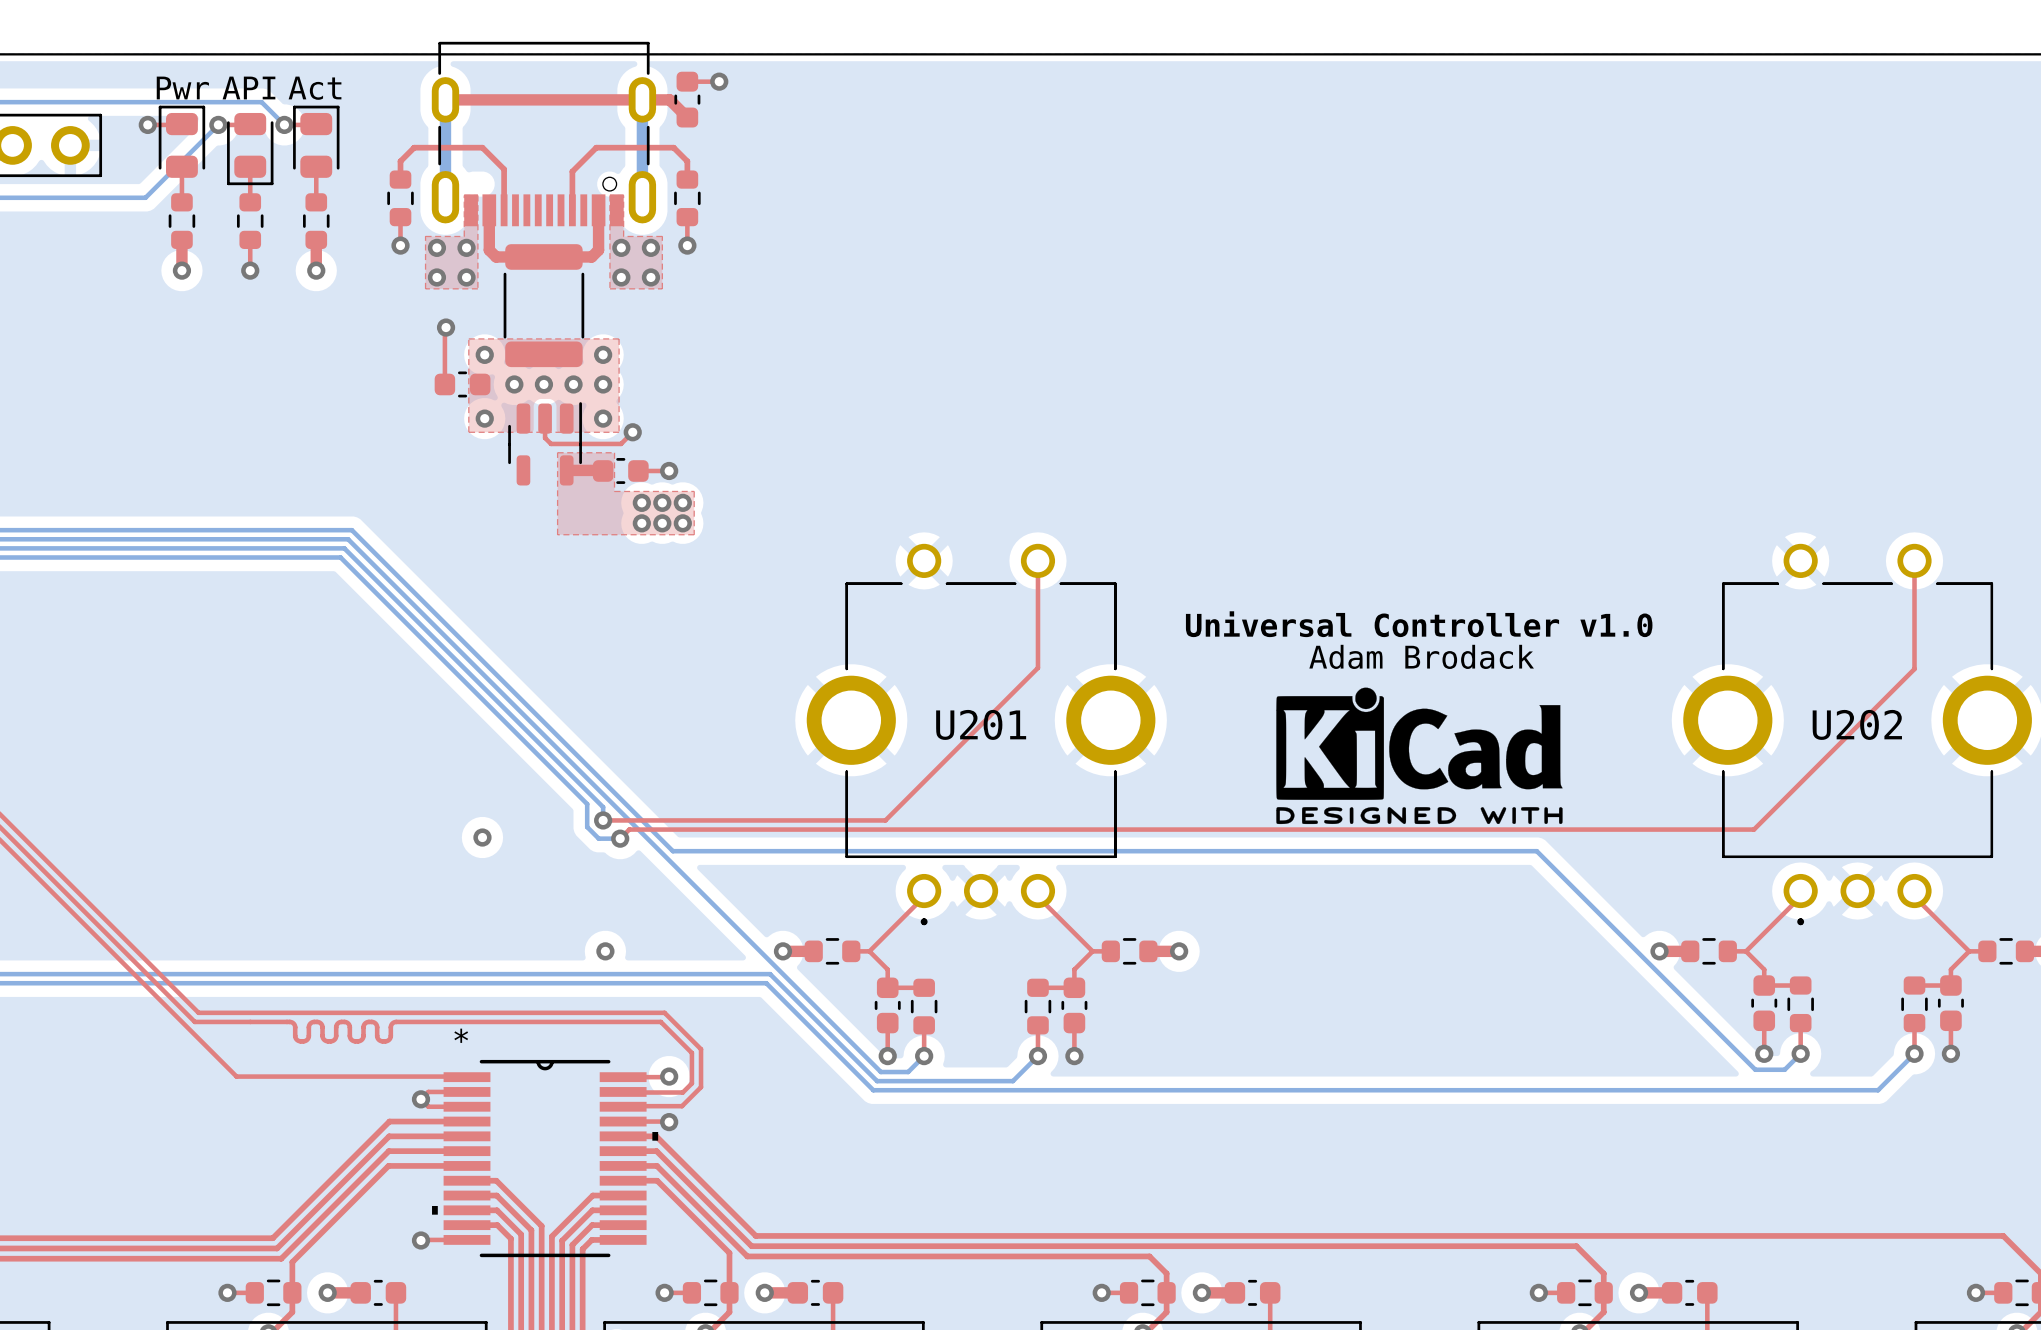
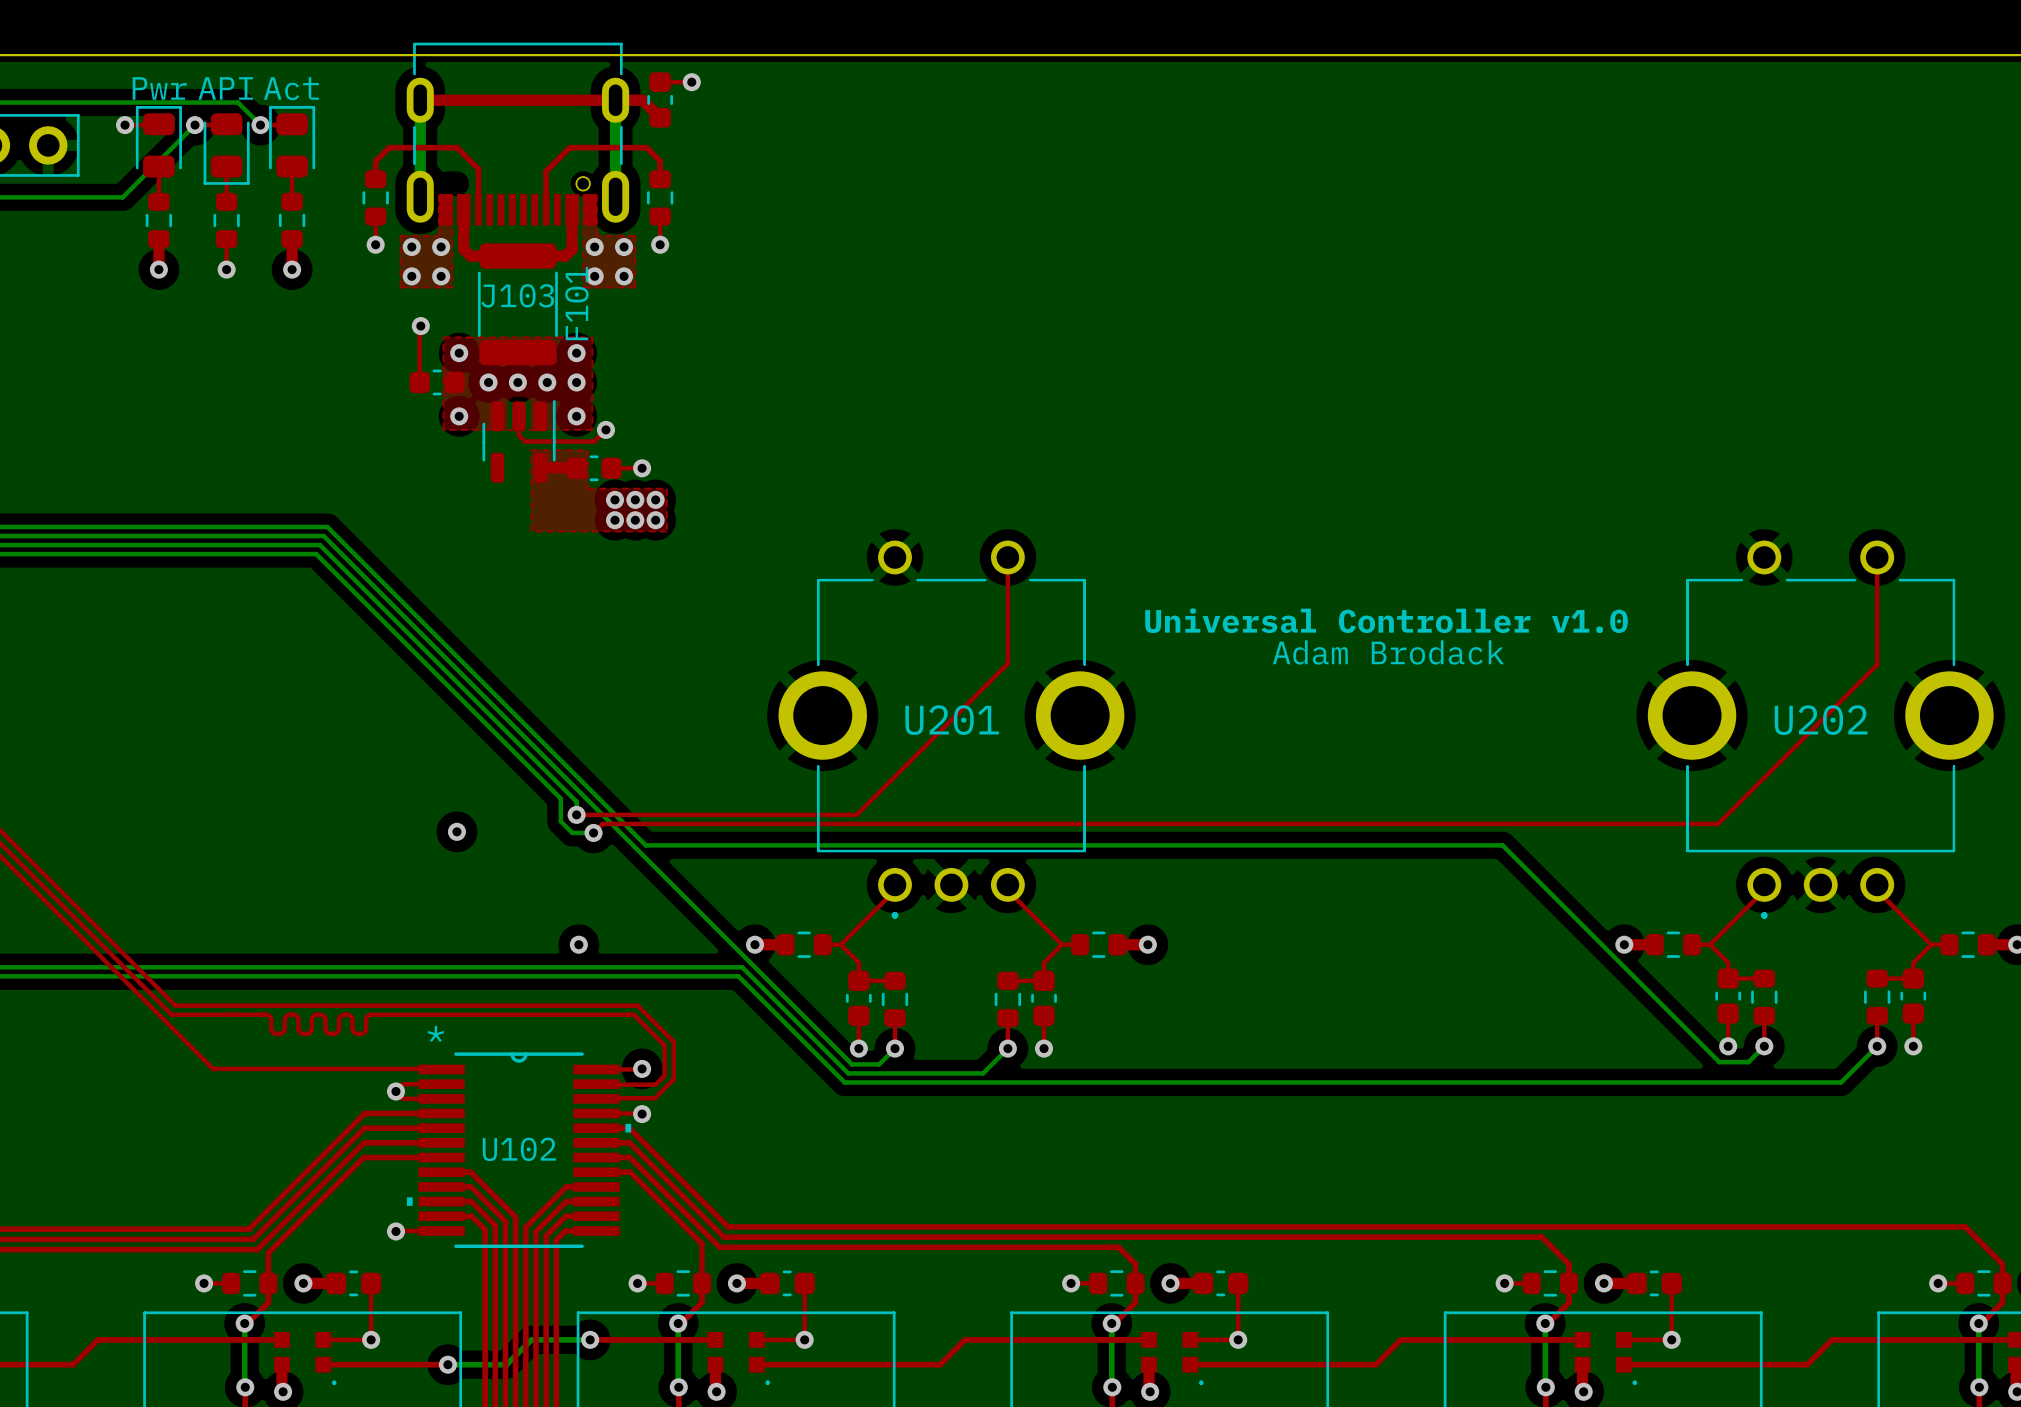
J103 name: none -> J103 (517, 295)
F101 name: none -> F101 (576, 303)
drawing: [1276, 687, 1563, 825] -> none
U102 name: none -> U102 (519, 1149)

